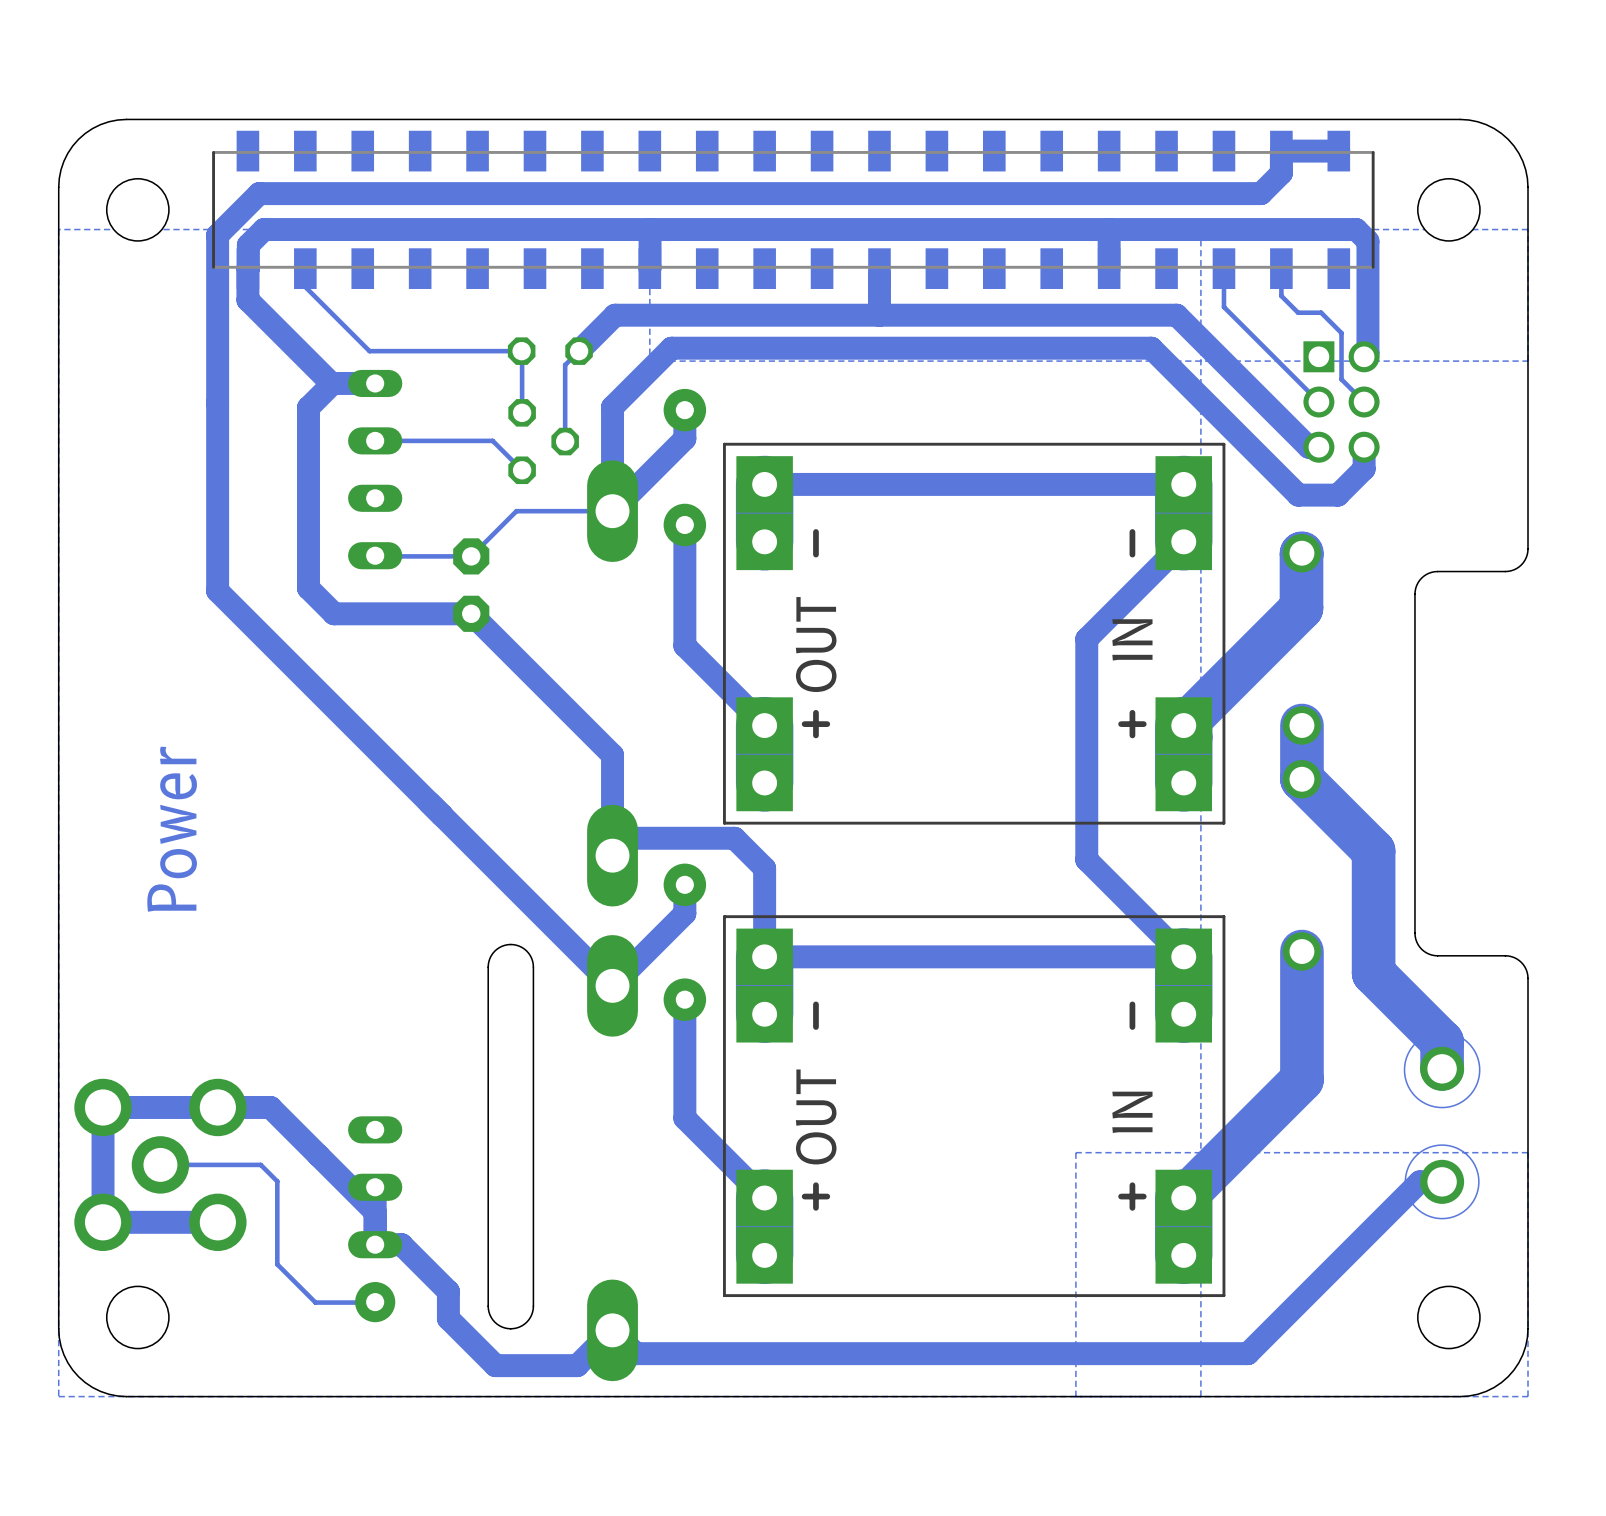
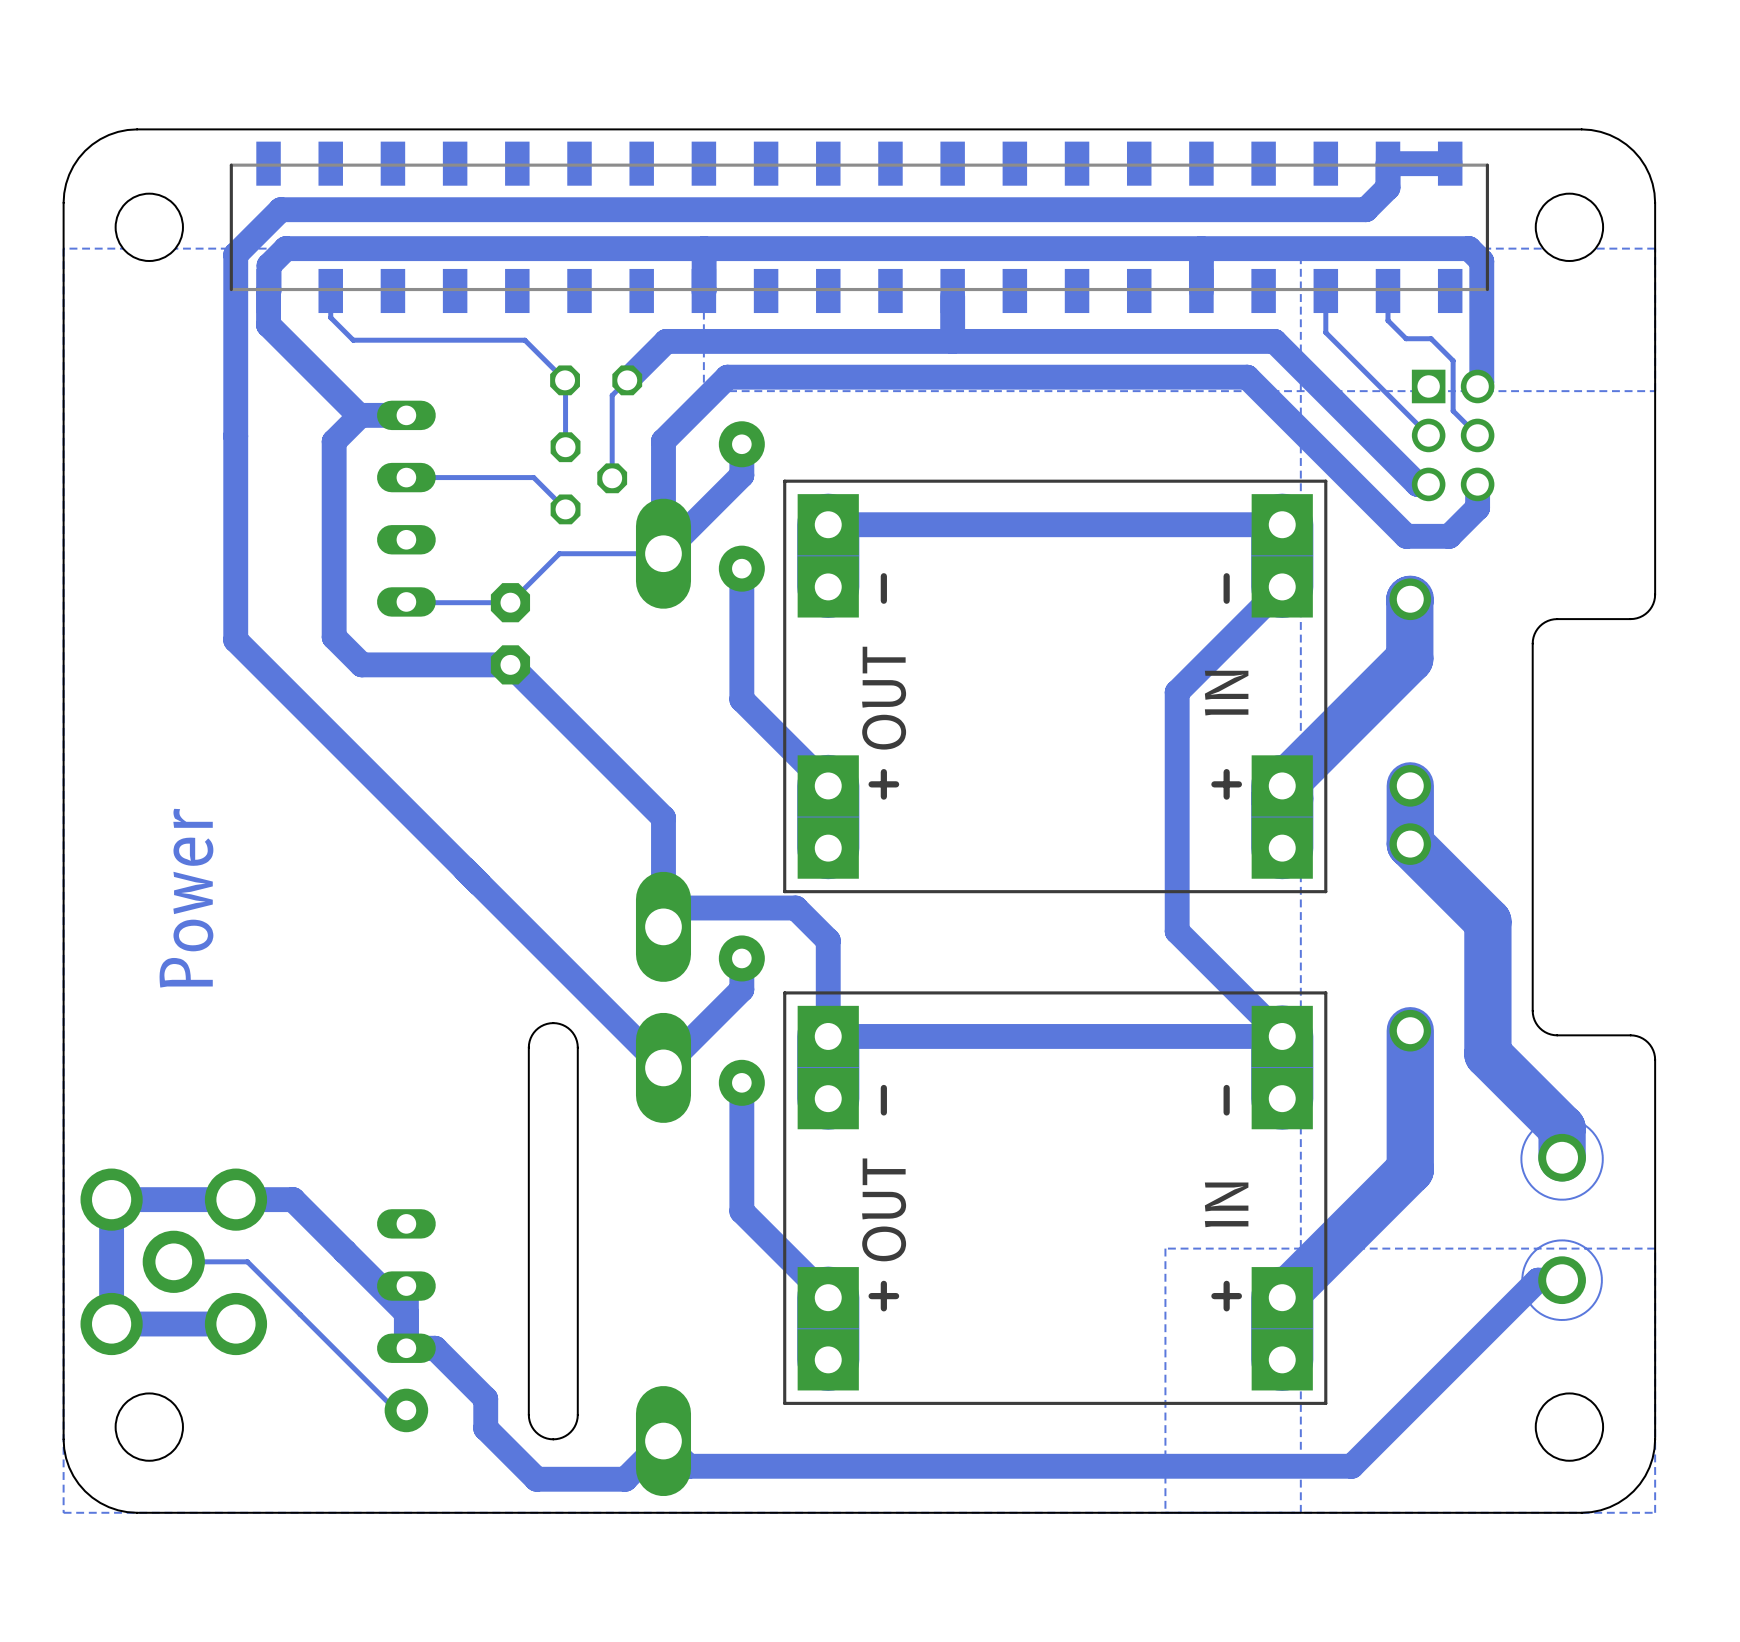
track: (305, 286) (369, 351) (521, 351) -> (330, 310) (330, 317) (353, 340) (524, 340) (565, 380)
track: (228, 1164) (260, 1164) (277, 1181) (277, 1264) (315, 1302) (366, 1302) -> (247, 1261) (396, 1410)

